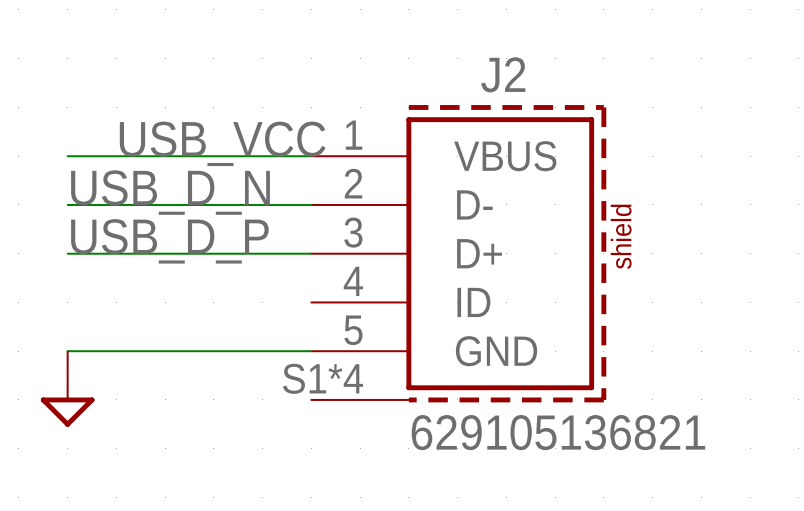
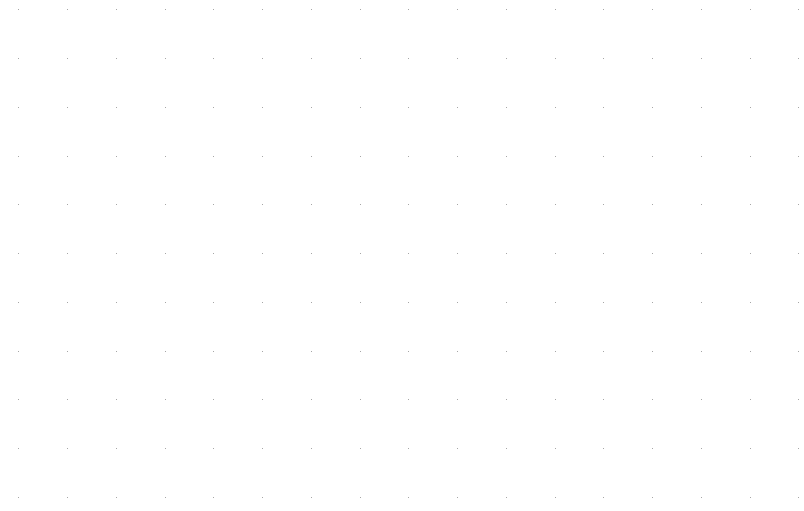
label: USB_VCC (222, 143) -> none
wire: (67, 156) (311, 156) -> none
label: USB_D_N (170, 192) -> none
wire: (67, 204) (311, 204) -> none
label: USB_D_P (169, 241) -> none
wire: (67, 253) (311, 253) -> none
J2: 629105136821 (458, 253) -> none
wire: (67, 351) (311, 351) -> none
power symbol: (67, 388) -> none

